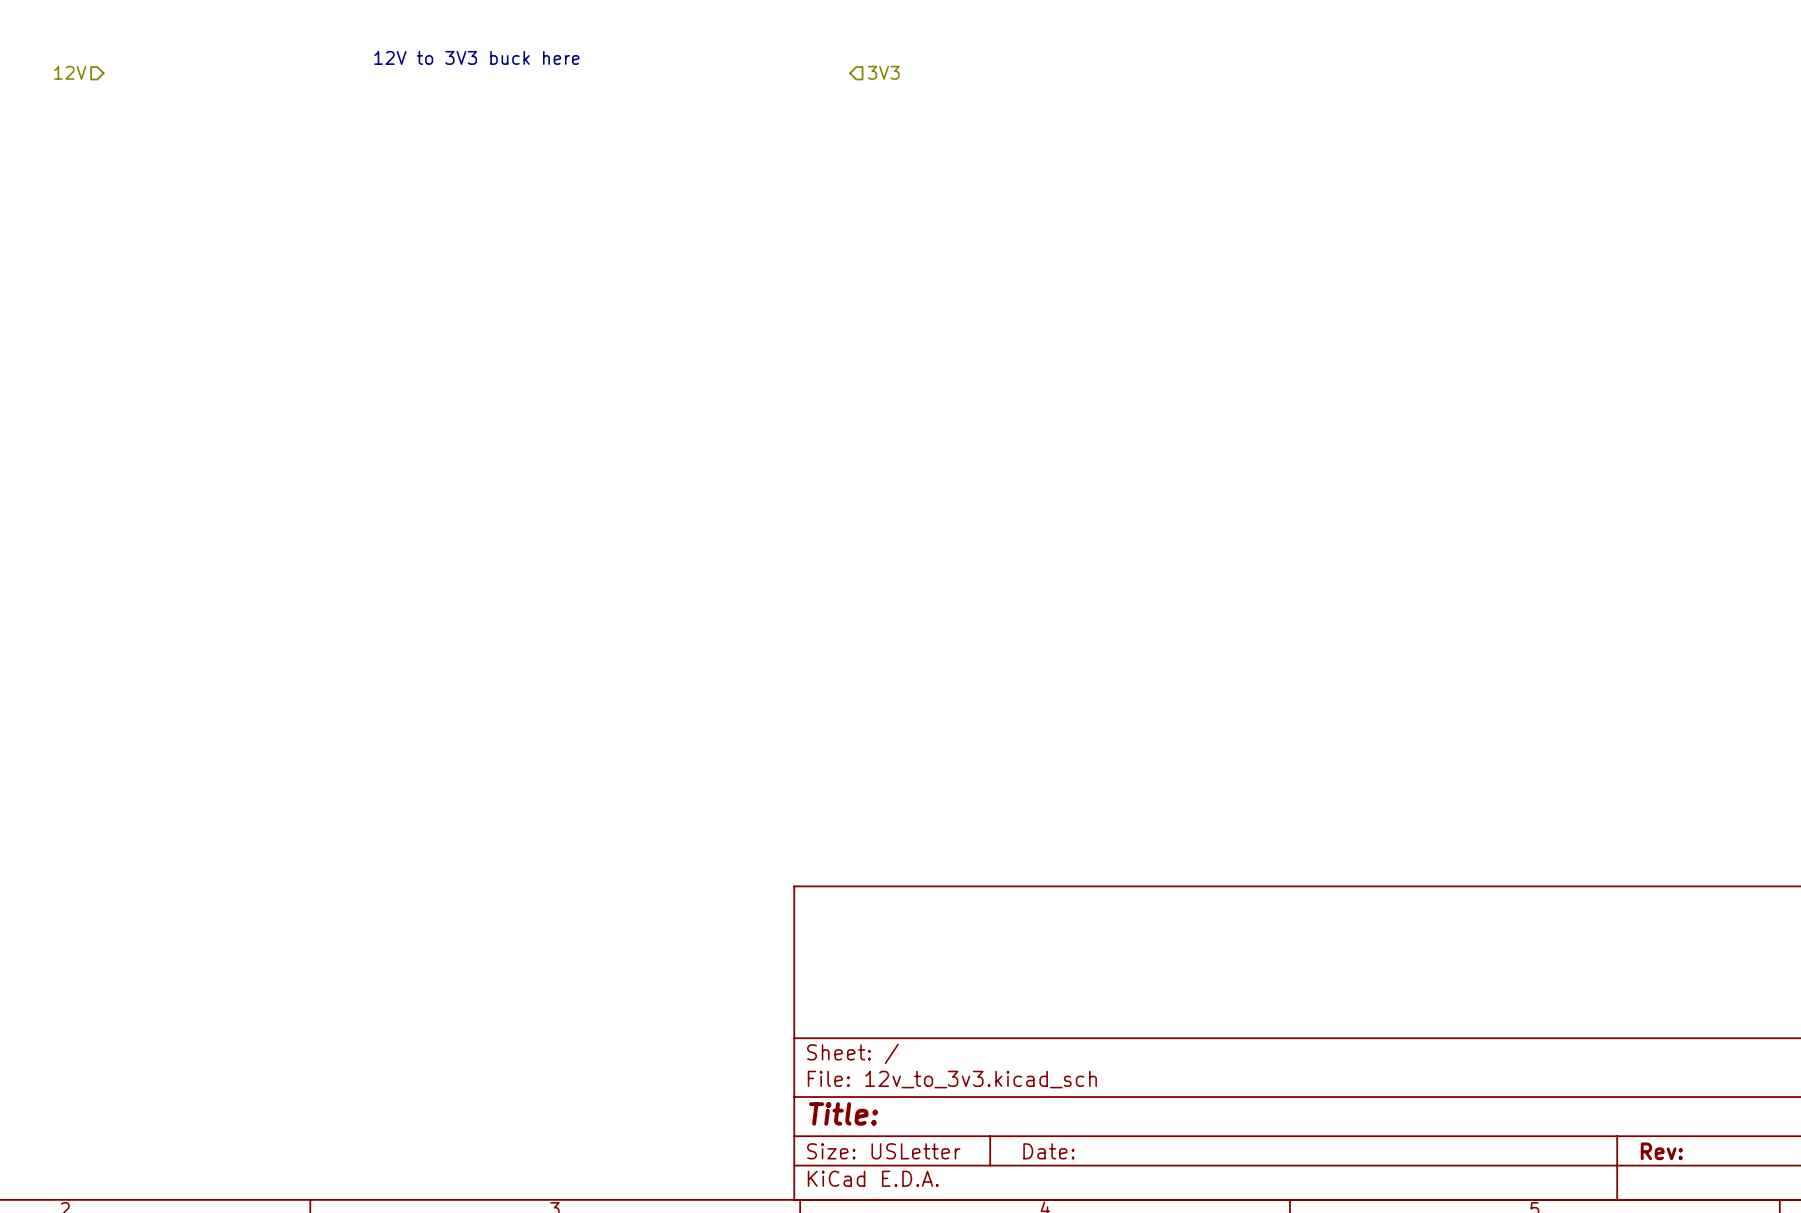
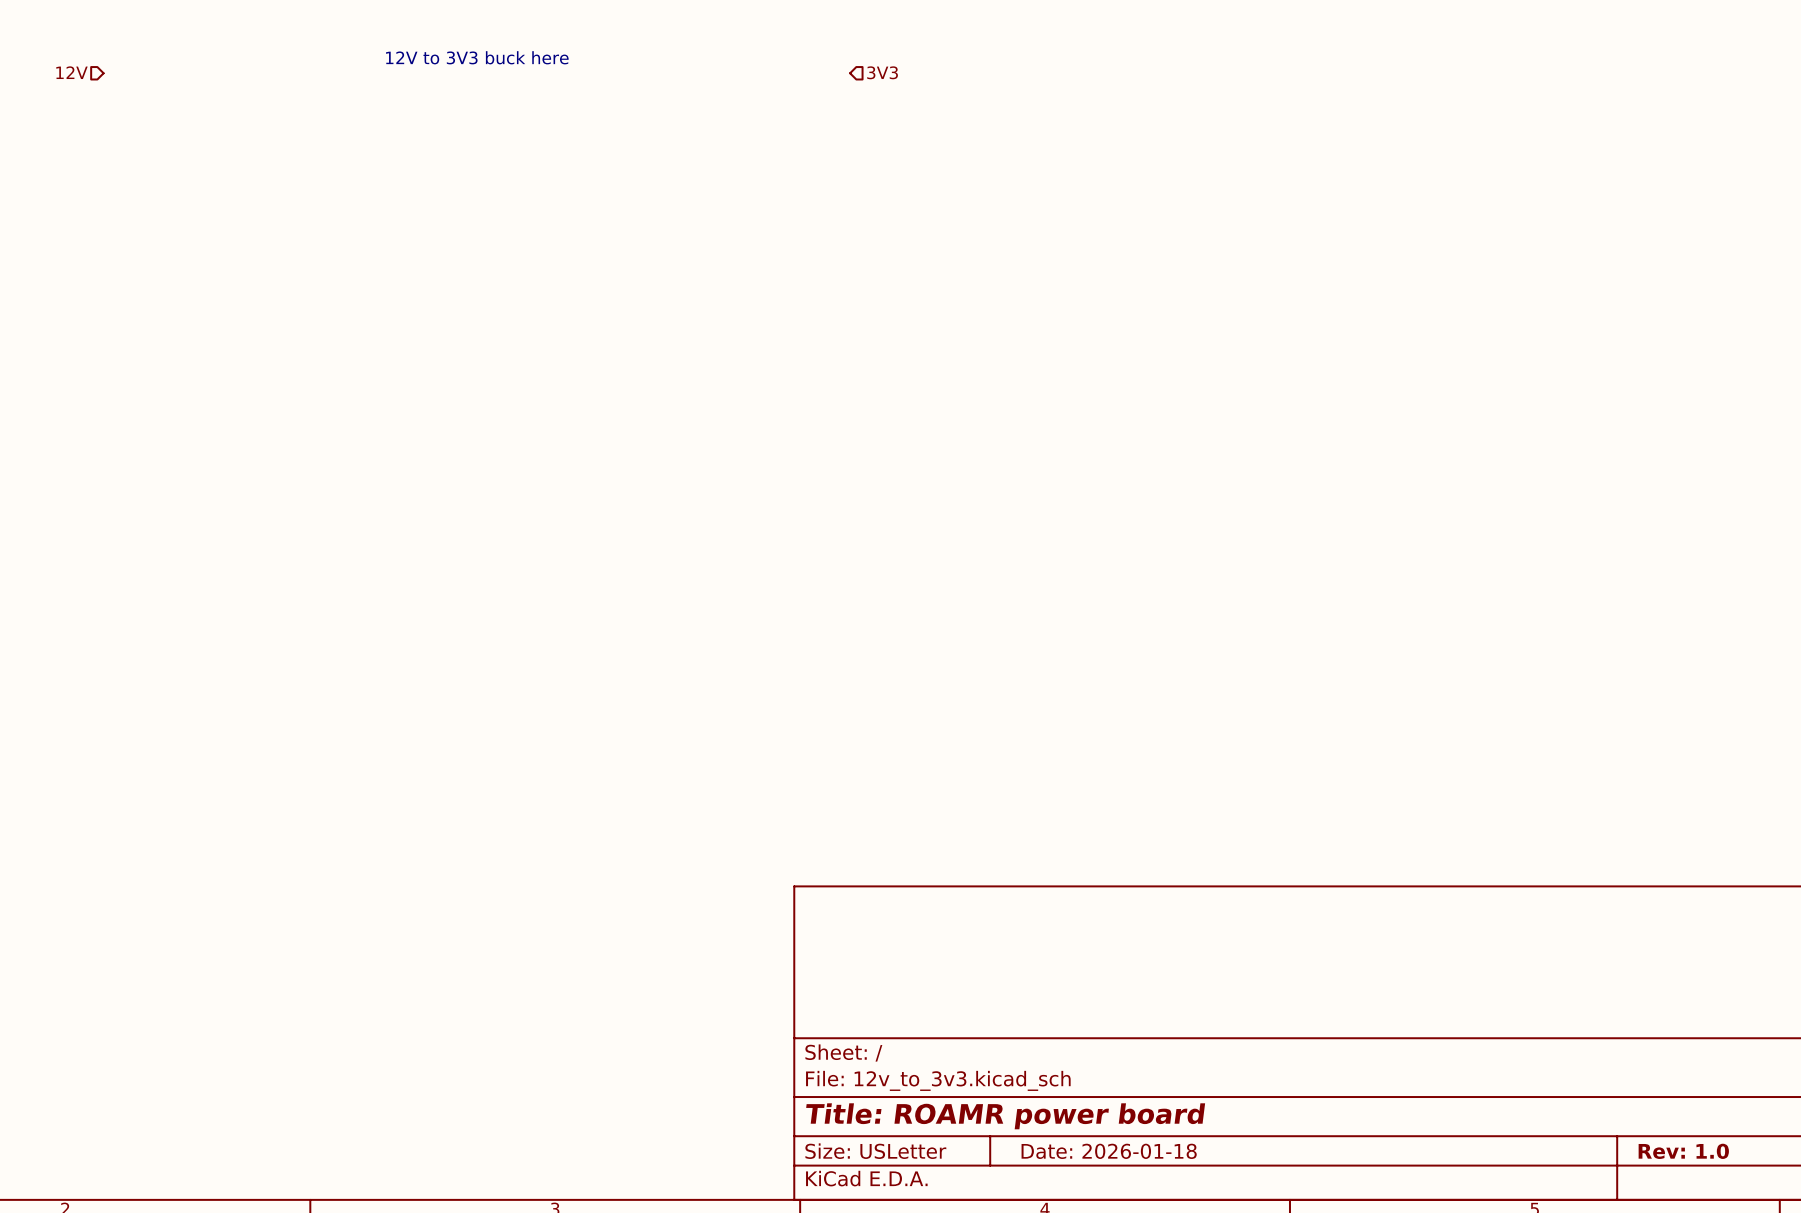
title block: Title: (843, 1113) -> Title: ROAMR power board (1005, 1116)
title block: Date: (1048, 1151) -> Date: 2026-01-18 (1109, 1151)
title block: Rev: (1661, 1151) -> Rev: 1.0 (1683, 1151)

